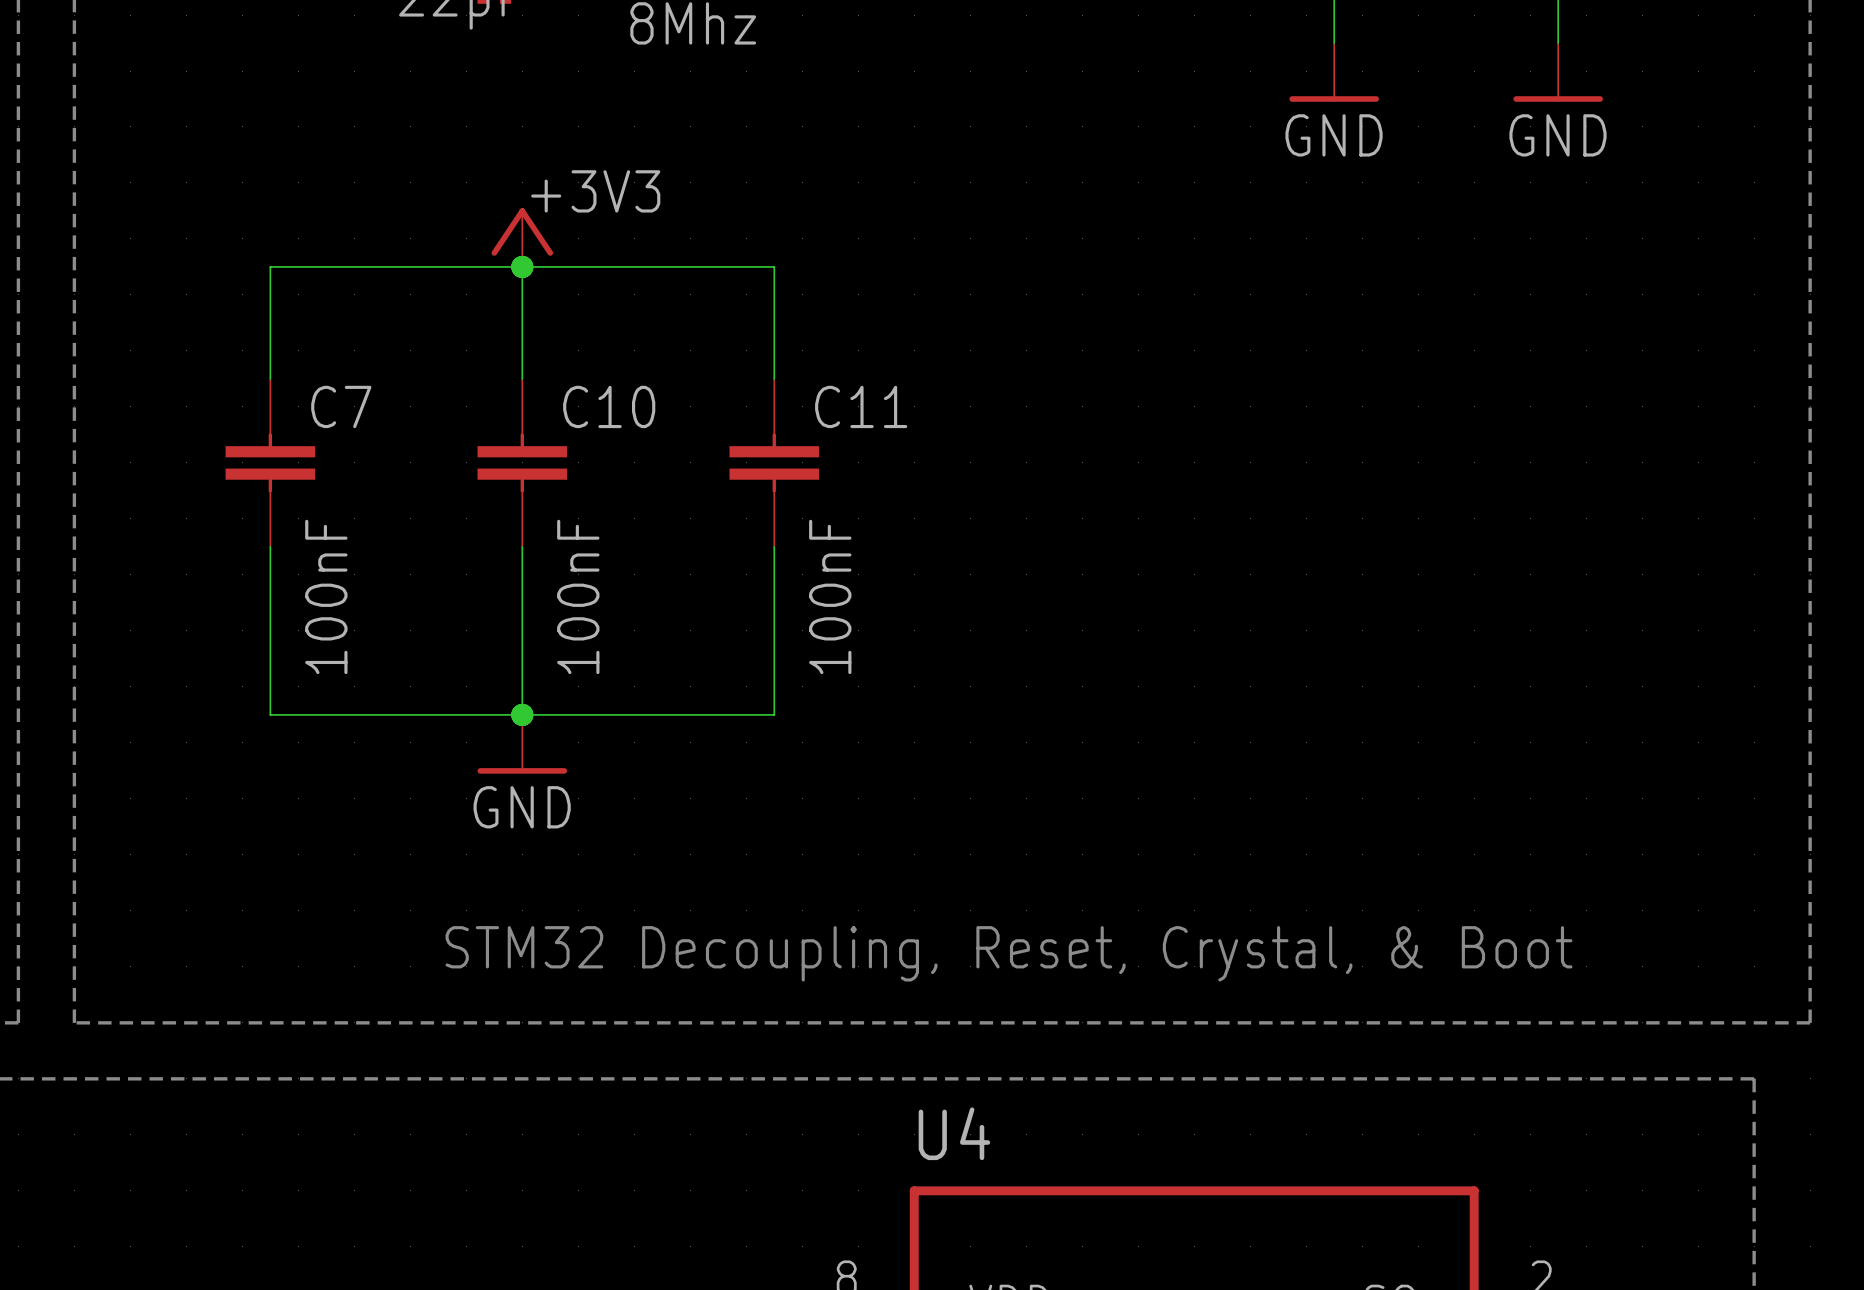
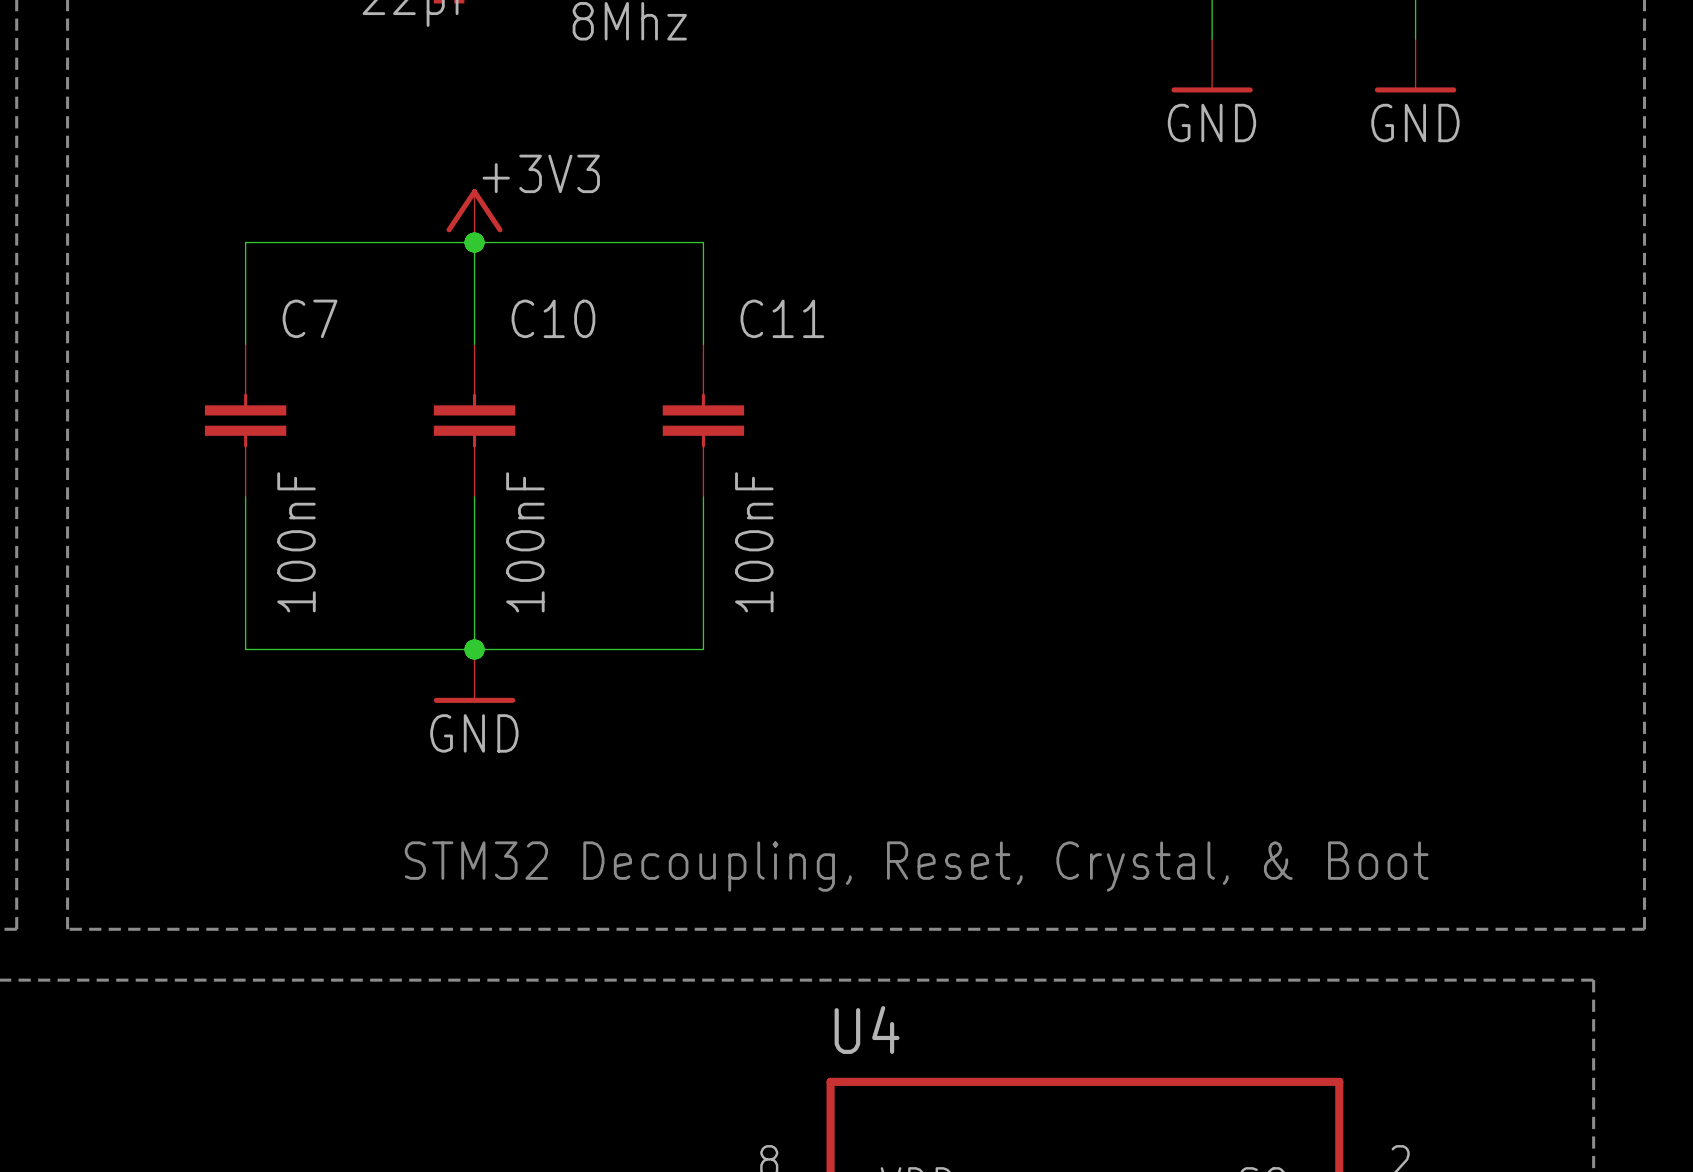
C7 name position: C7 (341, 406) -> C7 (310, 318)
C10 name position: C10 (609, 406) -> C10 (553, 318)
C11 name position: C11 (861, 406) -> C11 (782, 318)

